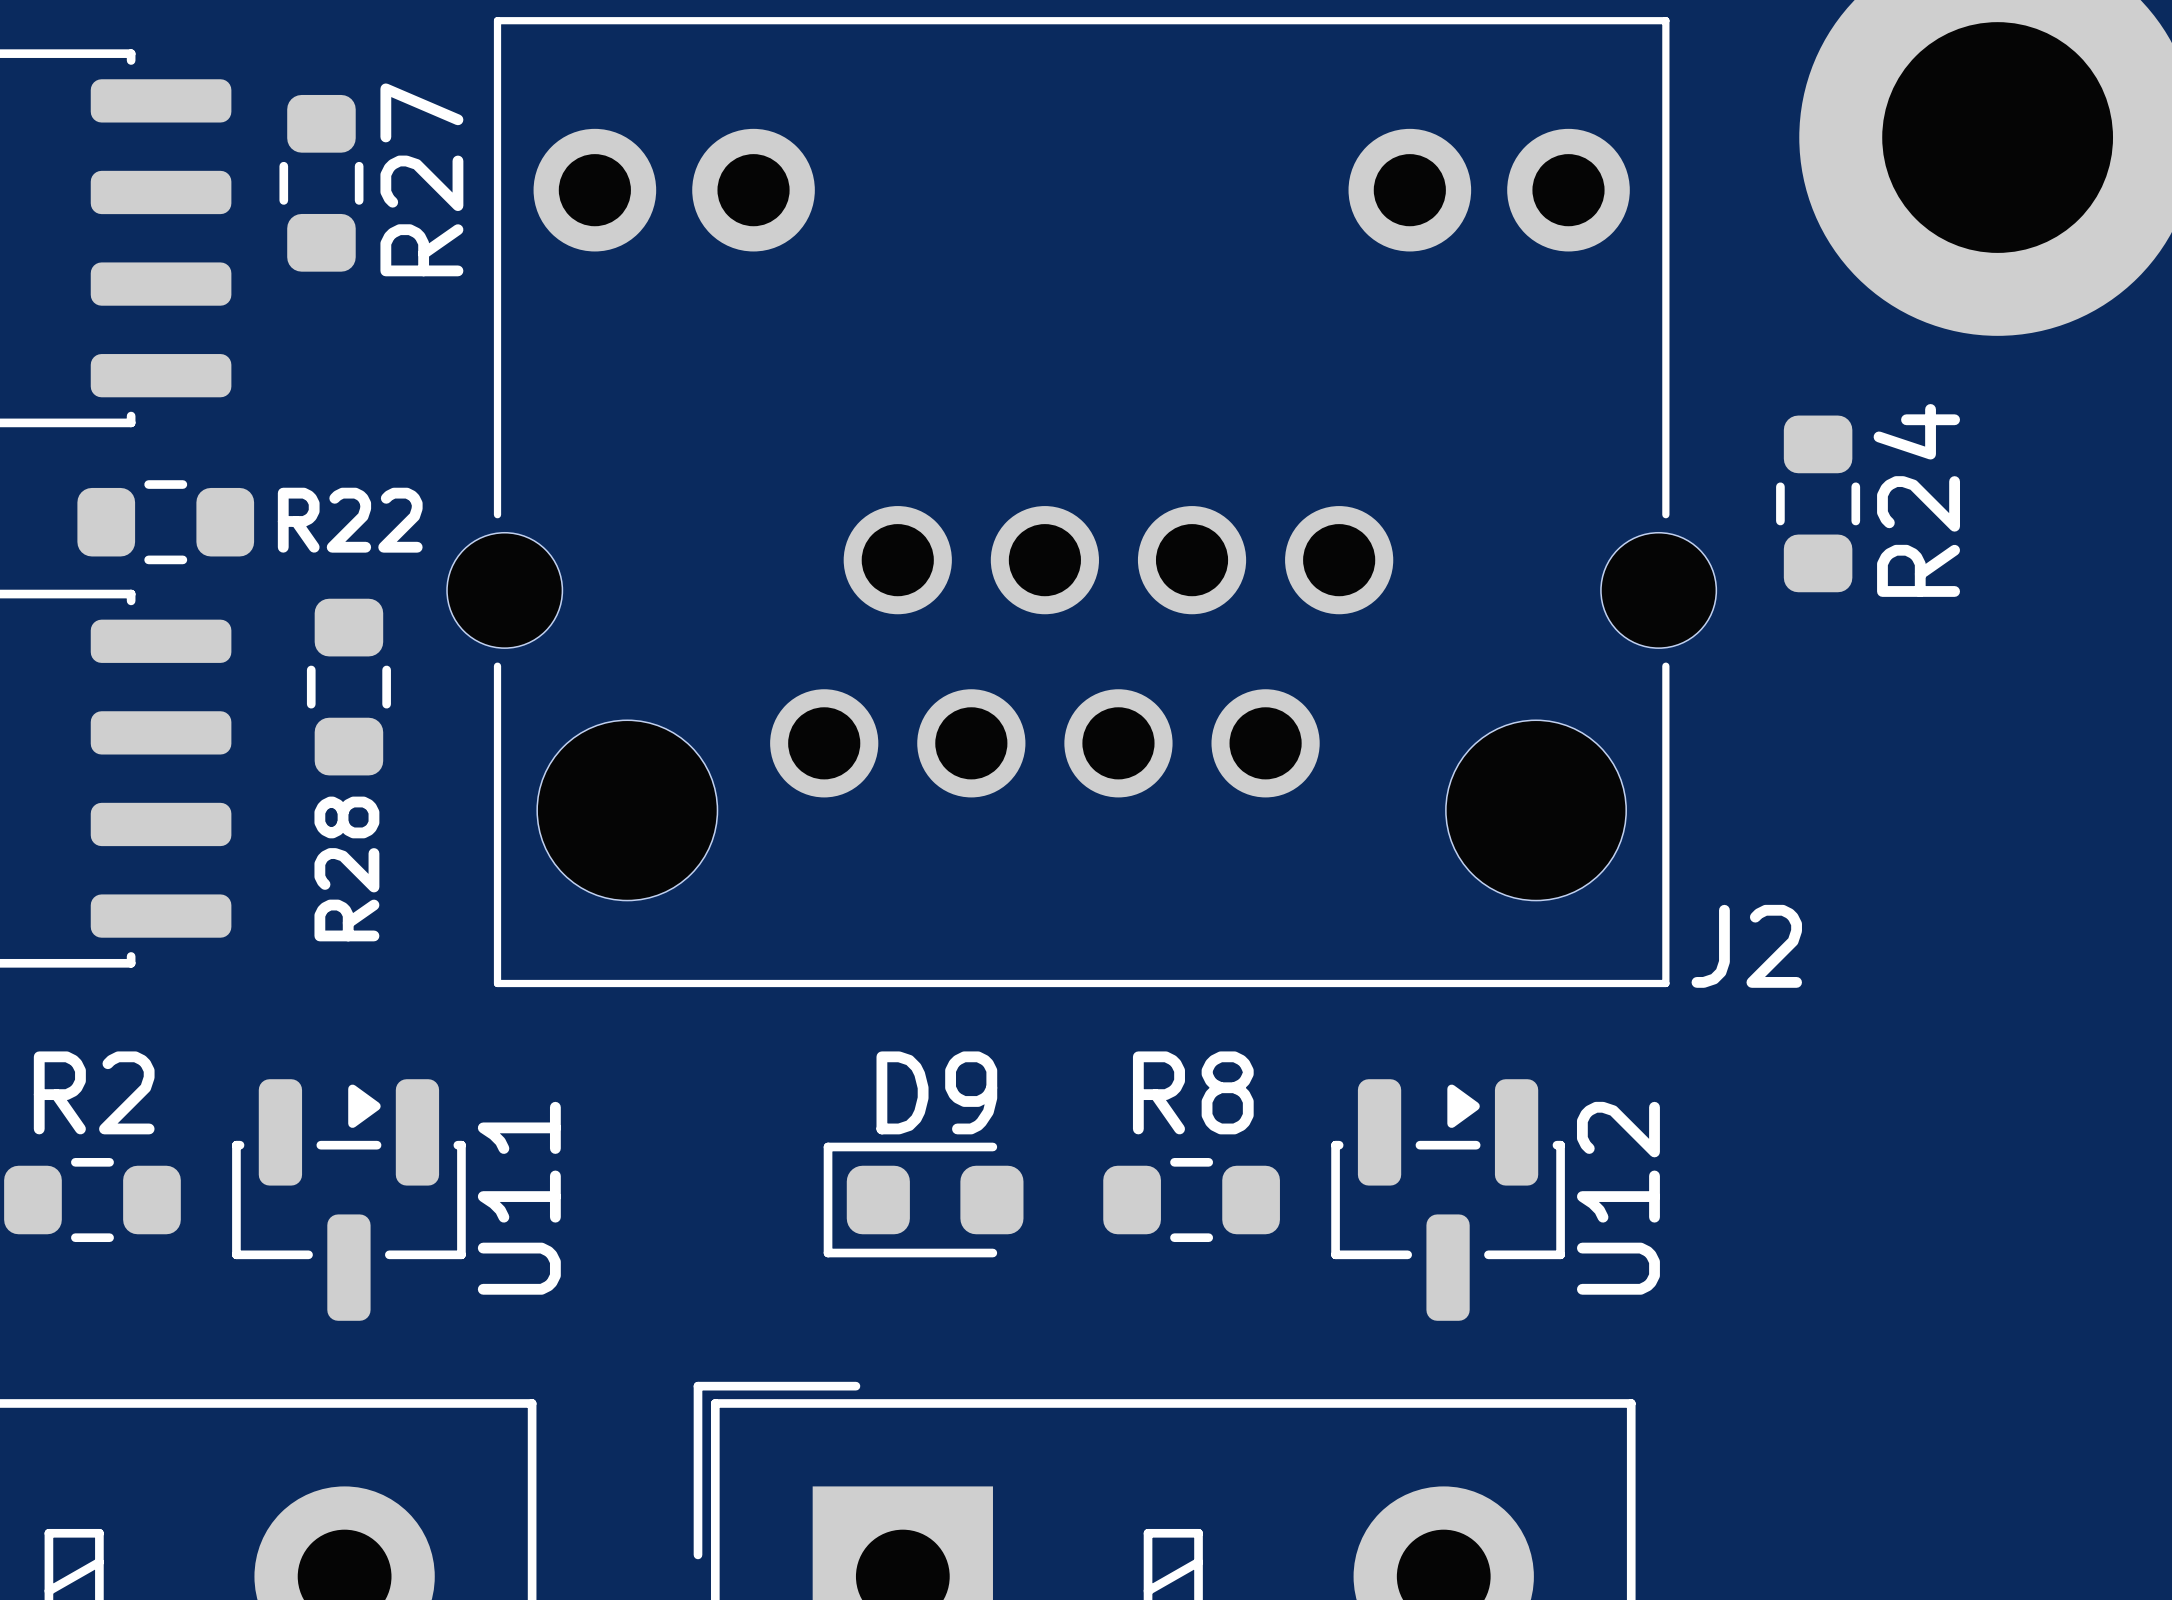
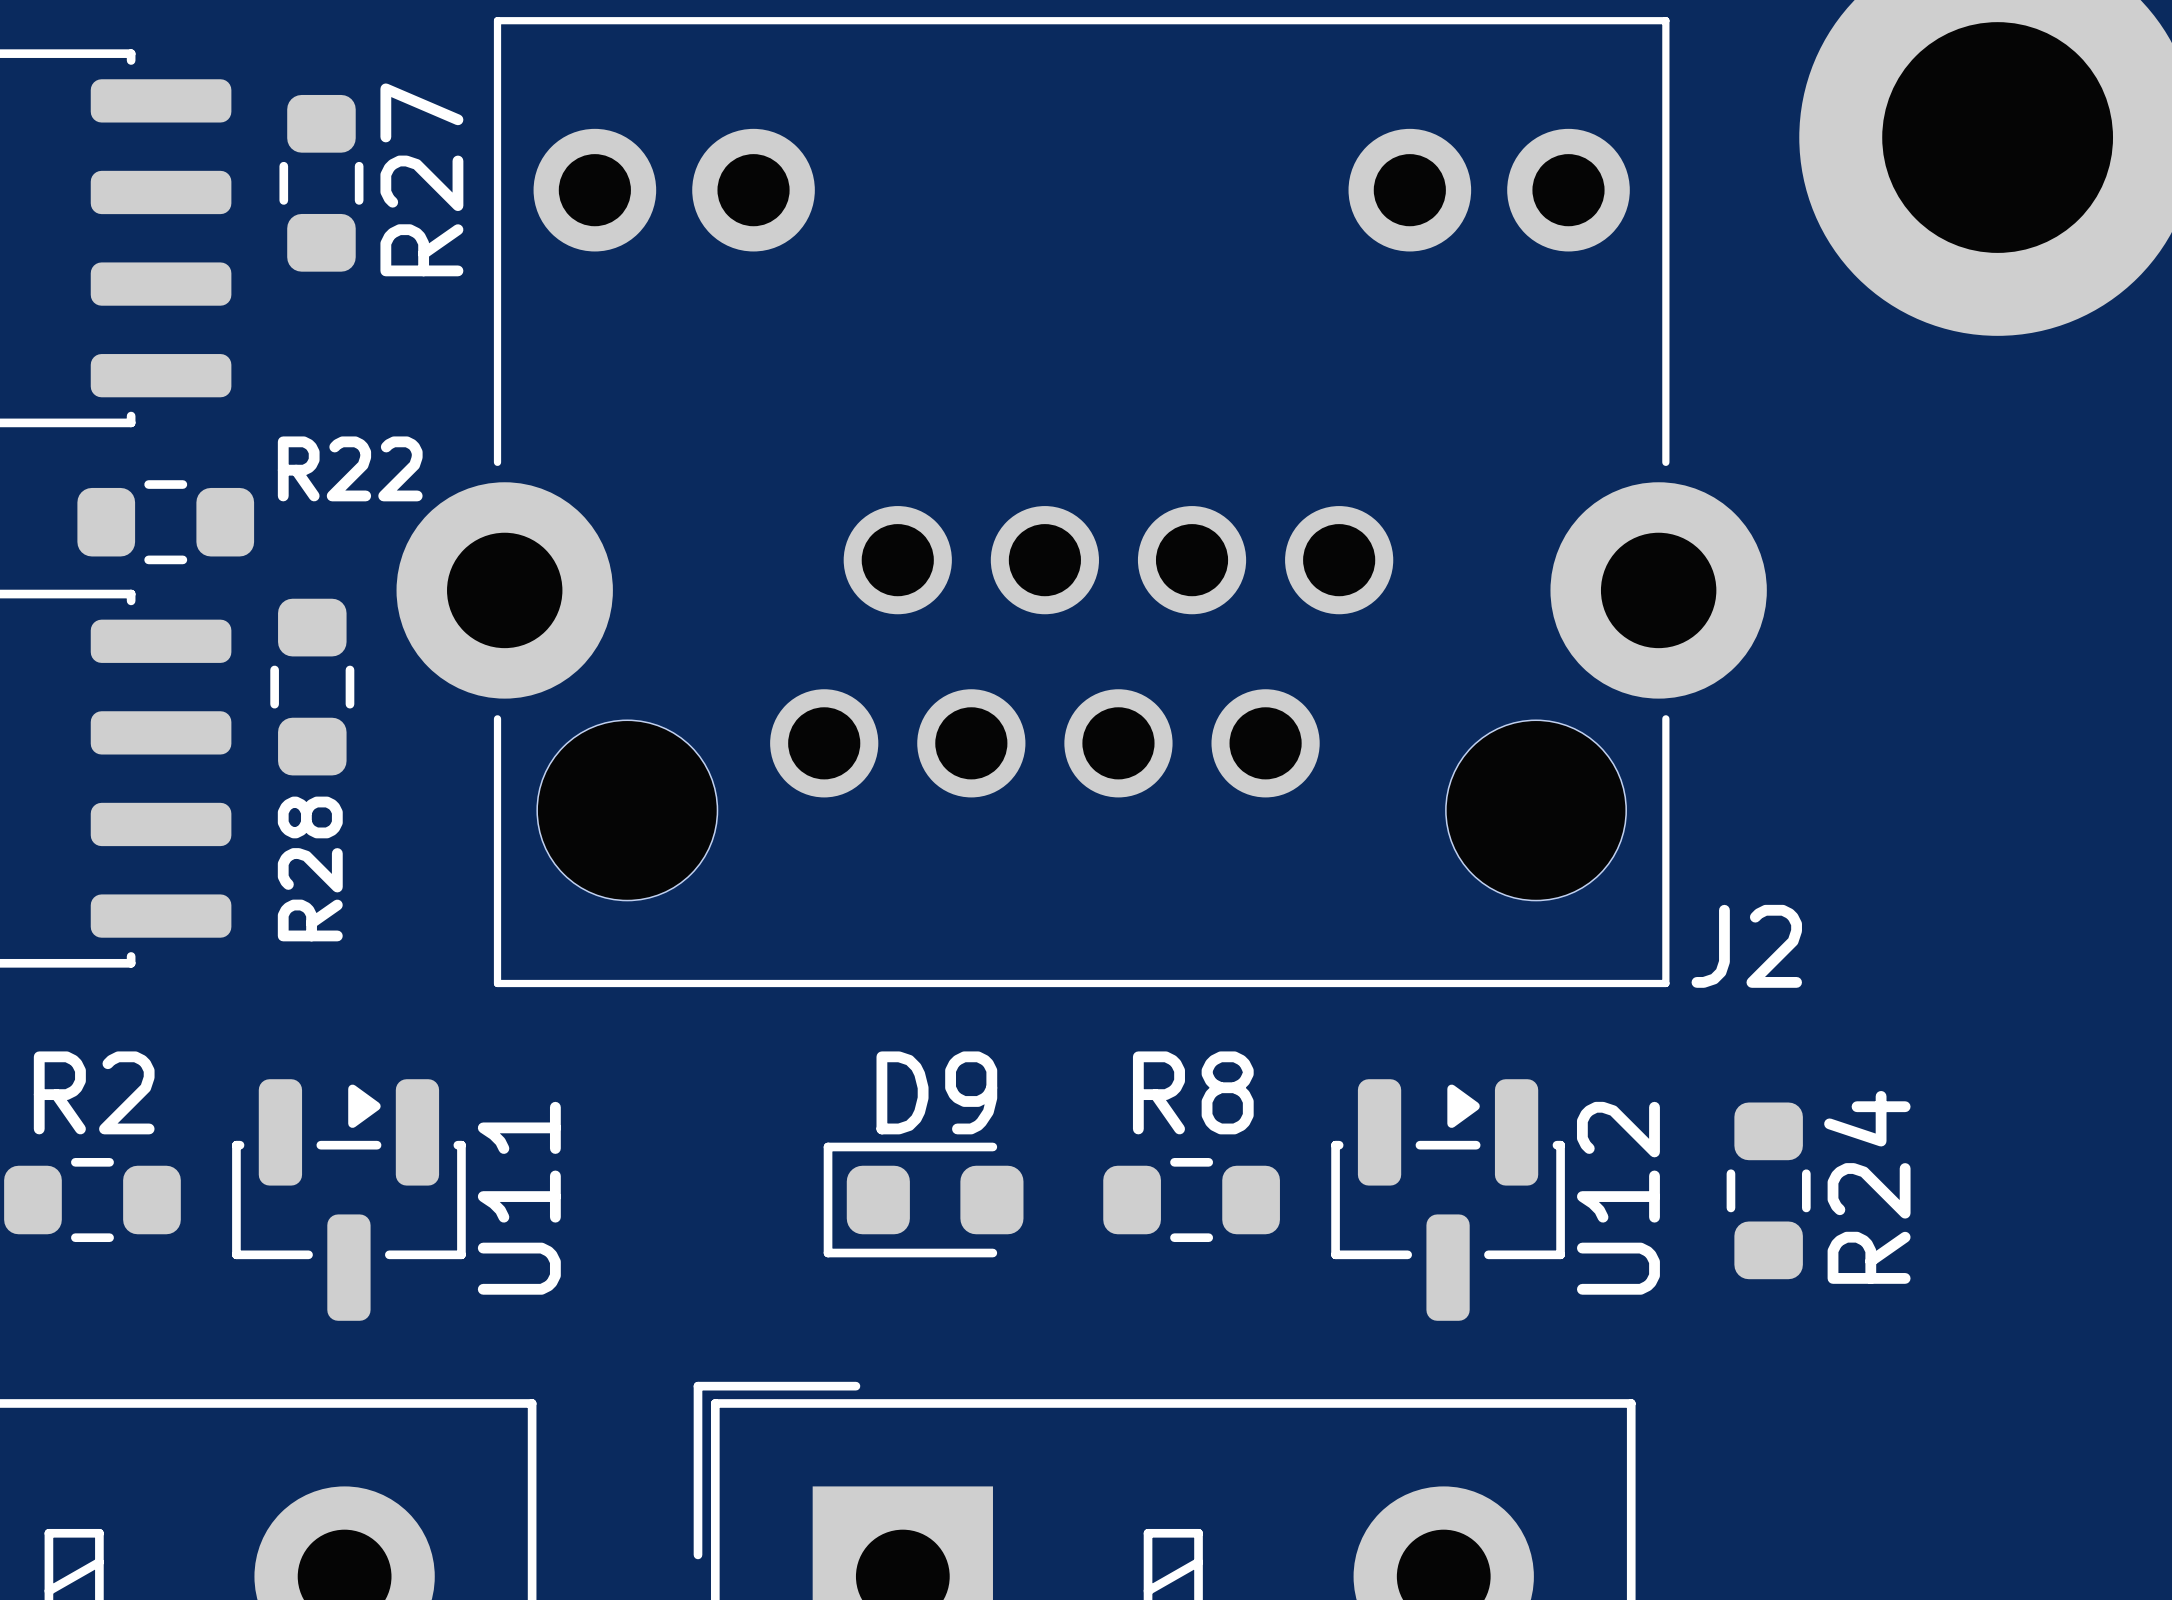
J2 footprint: [447, 17, 1717, 988] -> [396, 17, 1767, 988]
R24 position: (1818, 503) -> (1768, 1190)
R22 name position: R22 (350, 520) -> R22 (350, 468)
R28 position: (348, 687) -> (312, 687)

